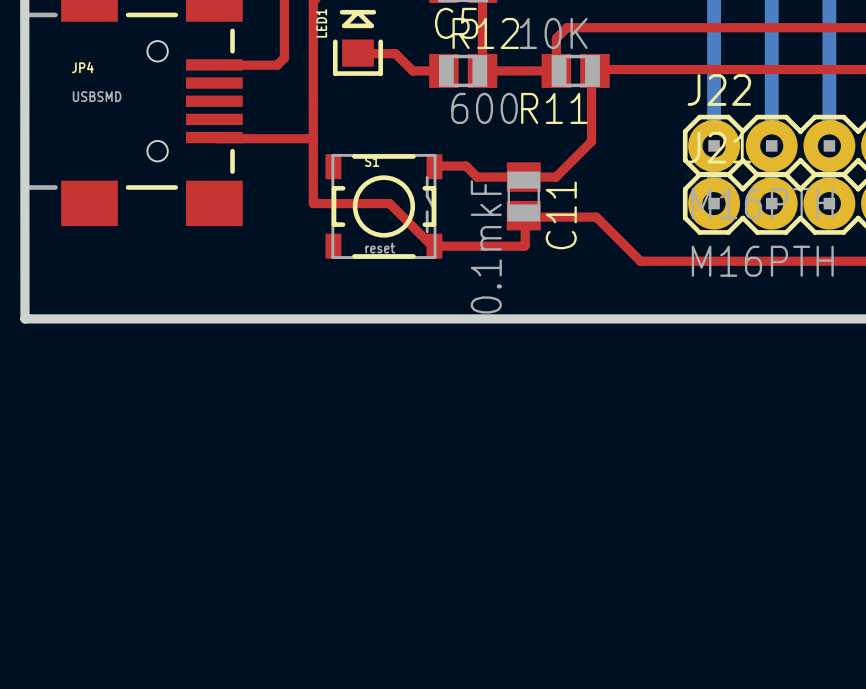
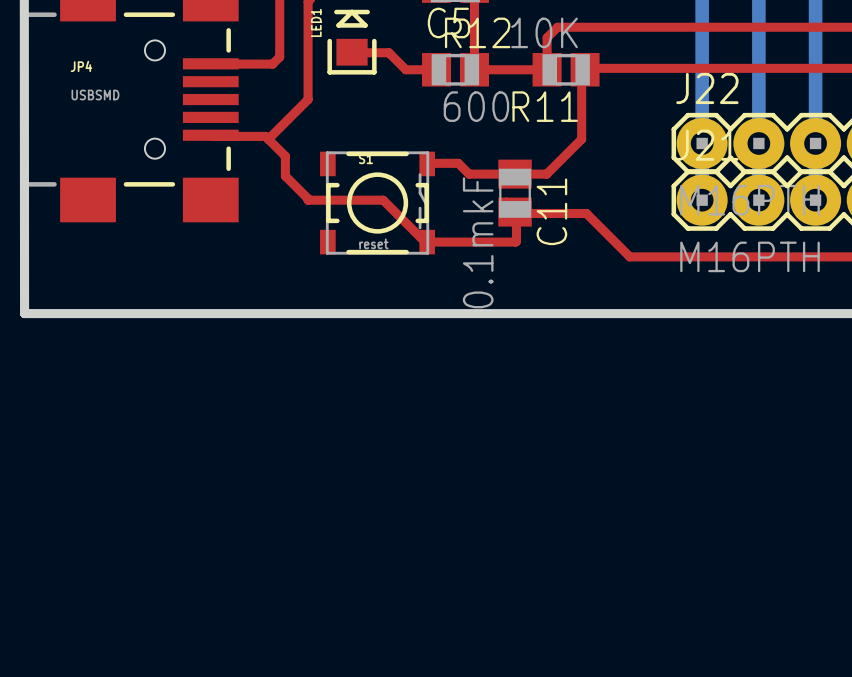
top track: none -> (308, 99) (268, 139)
top track: (313, 102) (313, 202) -> (265, 136) (285, 156) (285, 176) (308, 198)
top track: (270, 138) (313, 138) -> none

